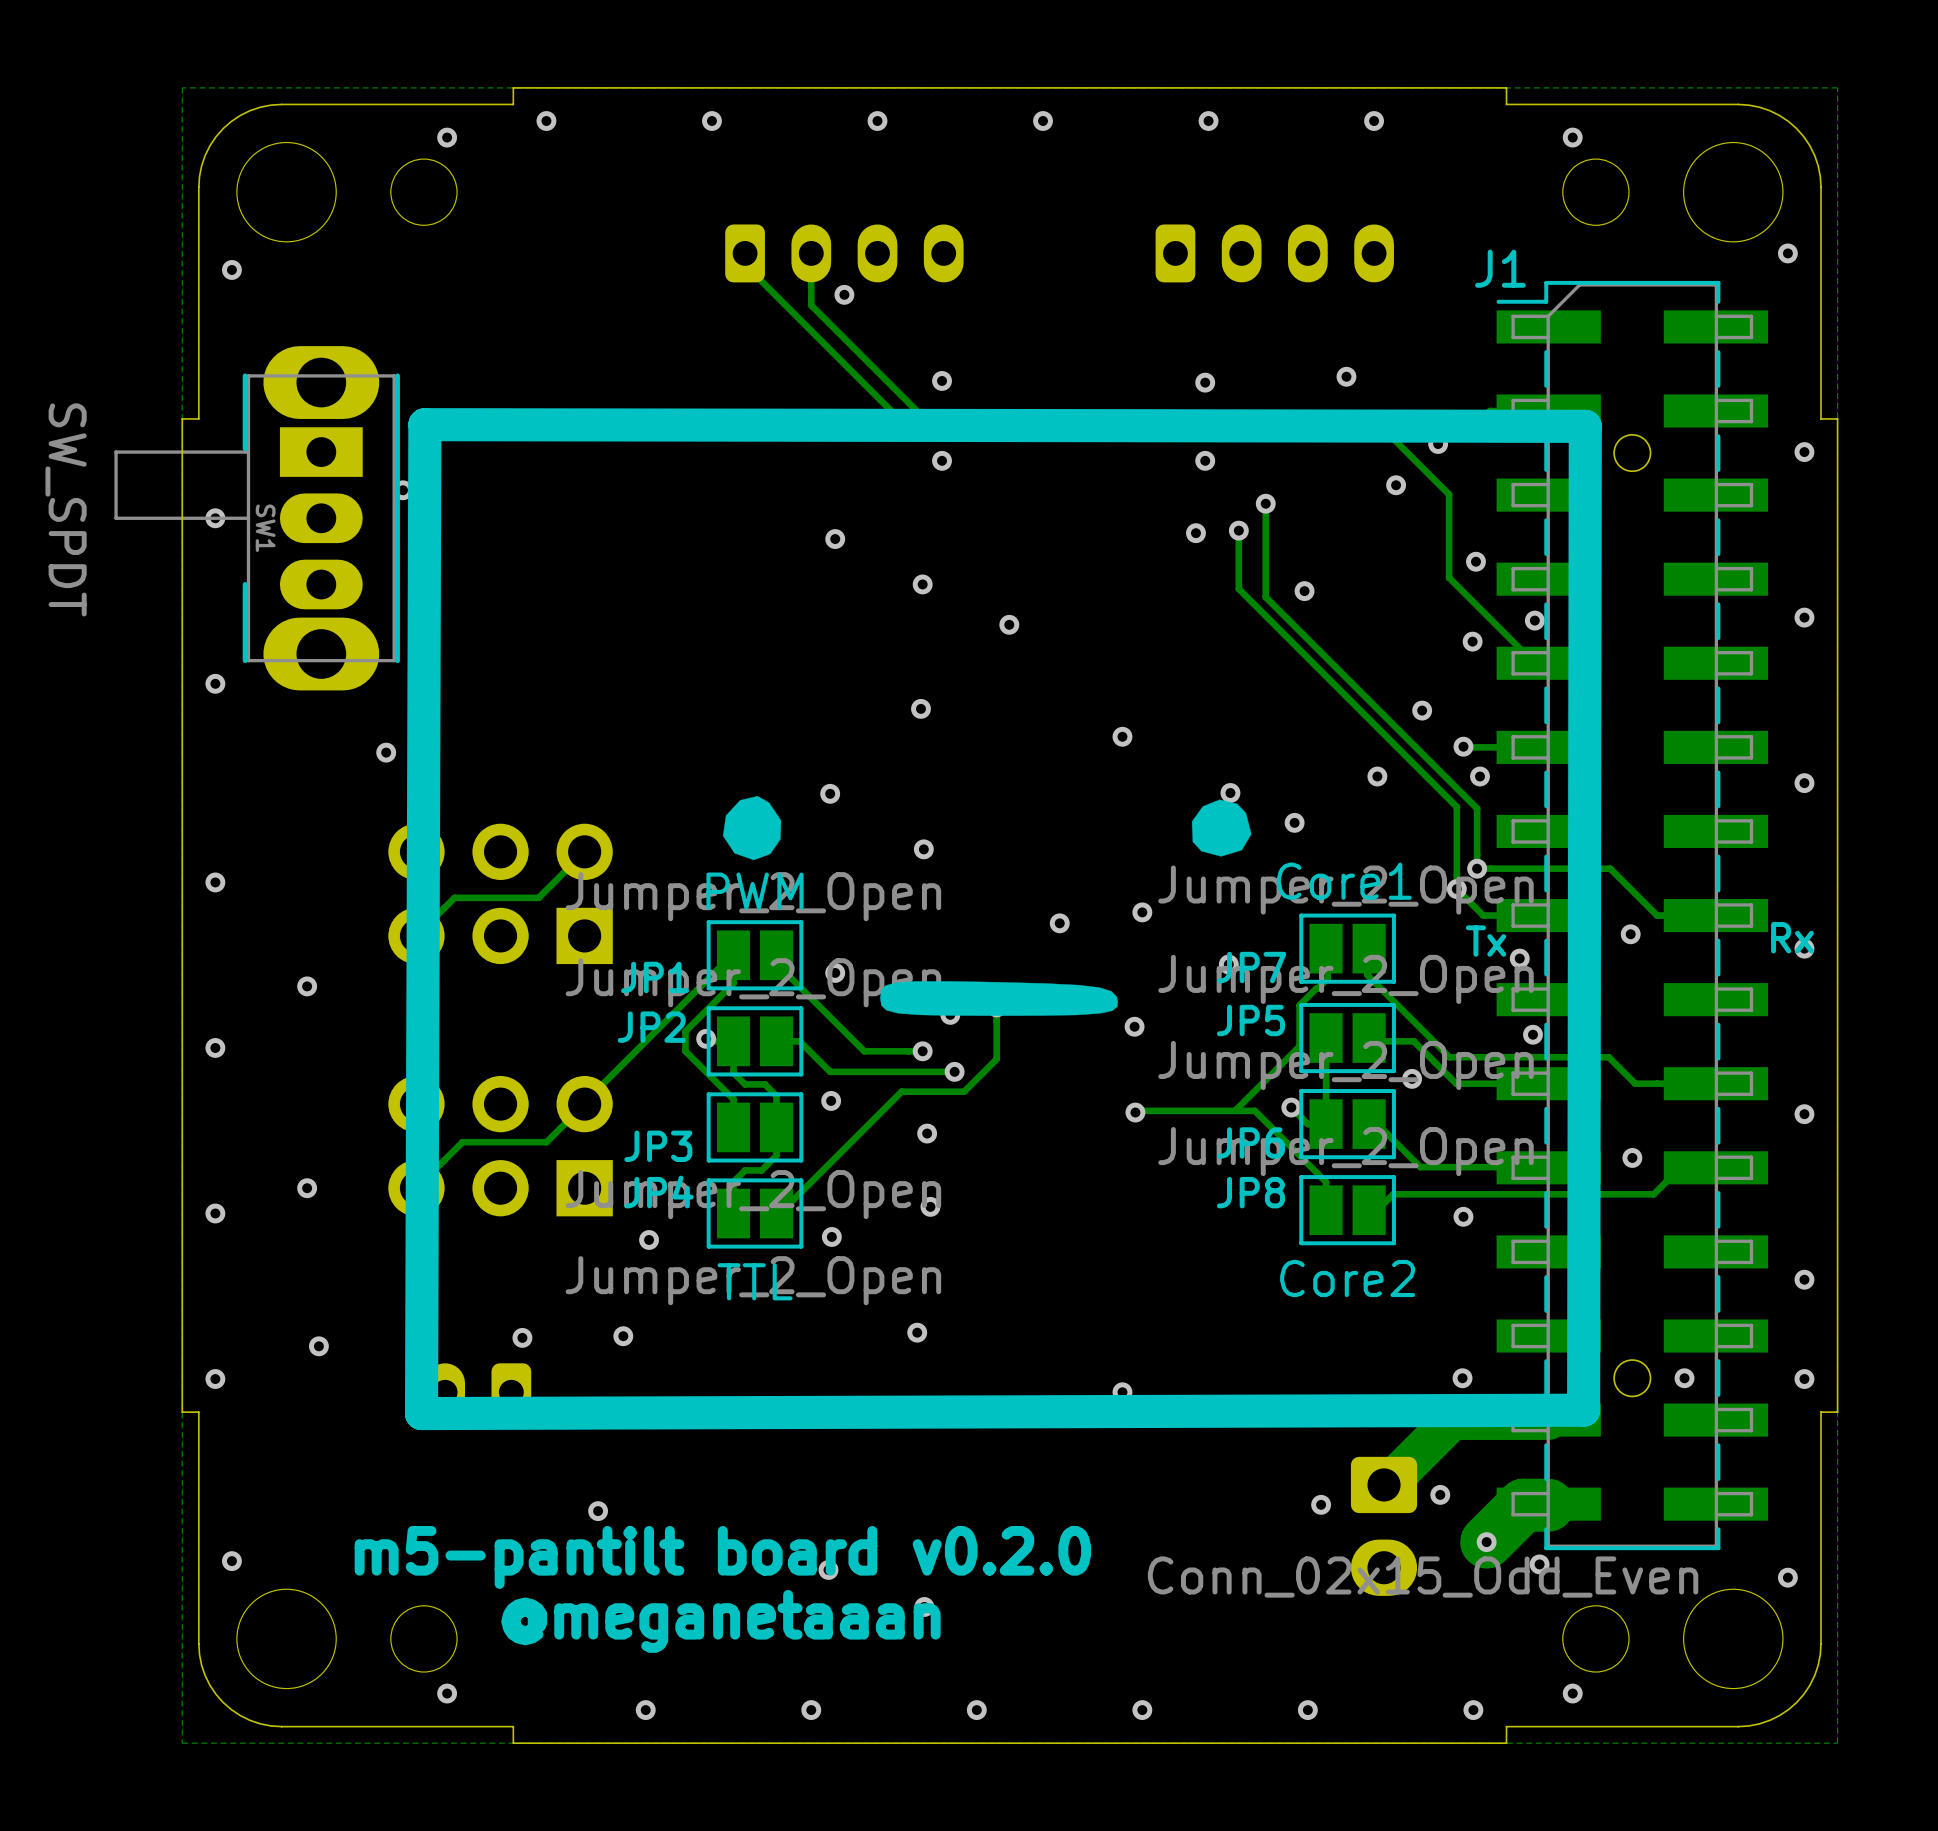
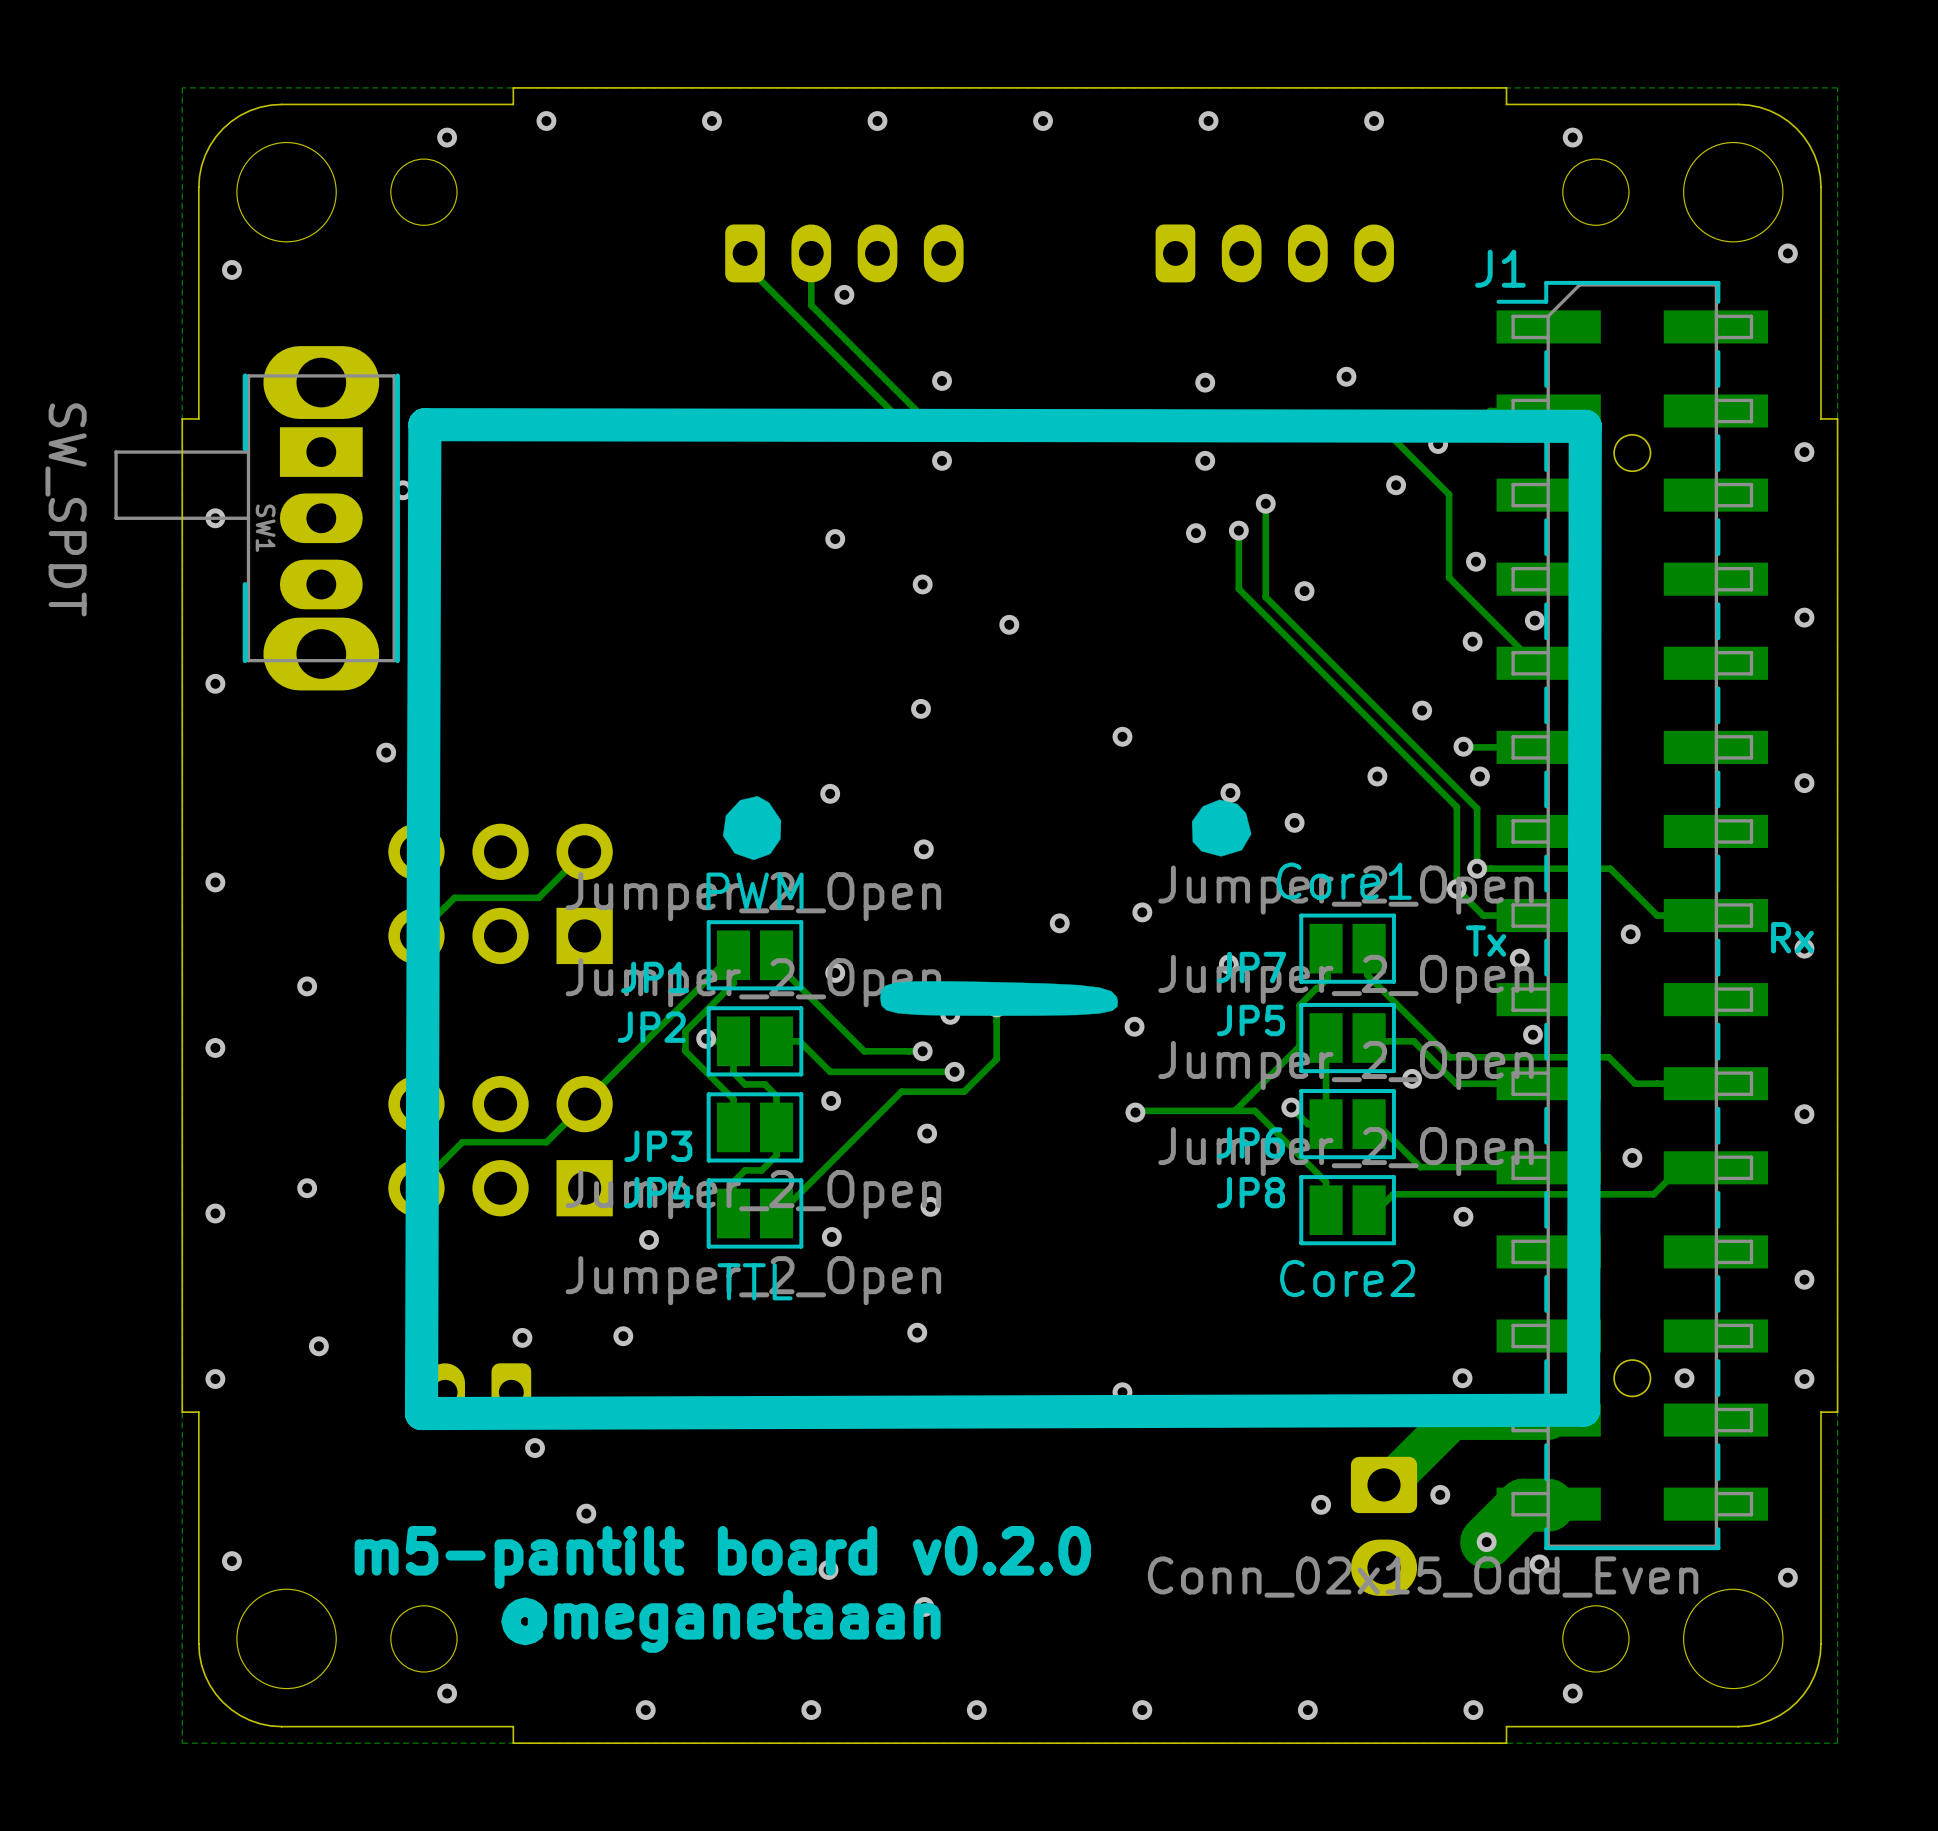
via: none -> (535, 1448)
via position: (598, 1511) -> (586, 1513)

